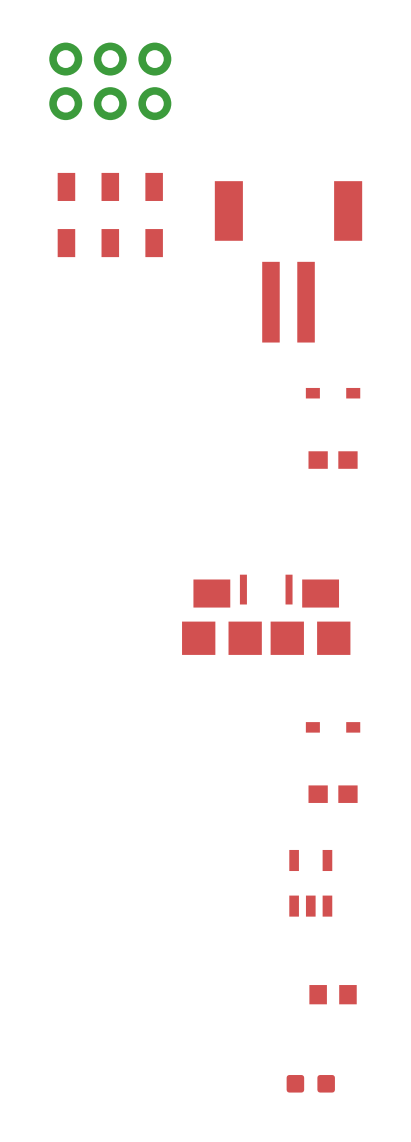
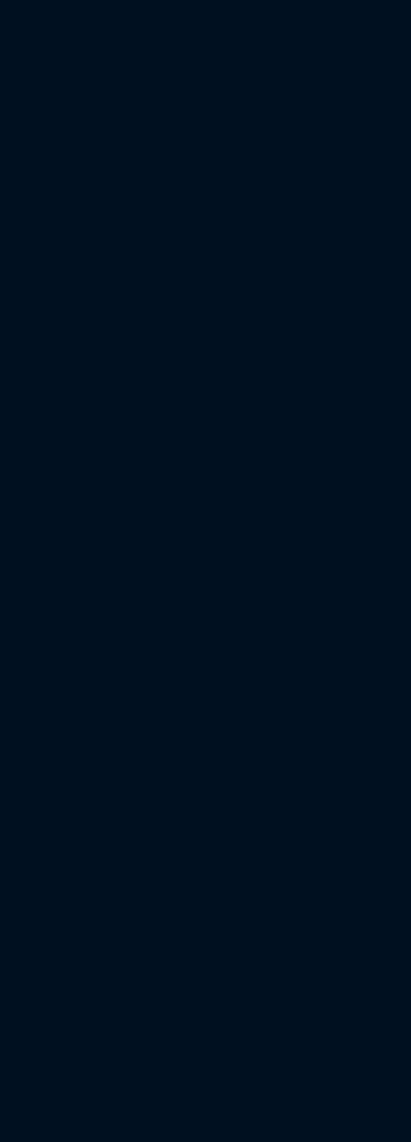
part: (110, 81) -> none
part: (110, 215) -> none
part: (288, 261) -> none
part: (333, 393) -> none
part: (333, 460) -> none
part: (266, 614) -> none
part: (333, 727) -> none
part: (333, 794) -> none
part: (310, 883) -> none
part: (333, 994) -> none
part: (310, 1083) -> none

